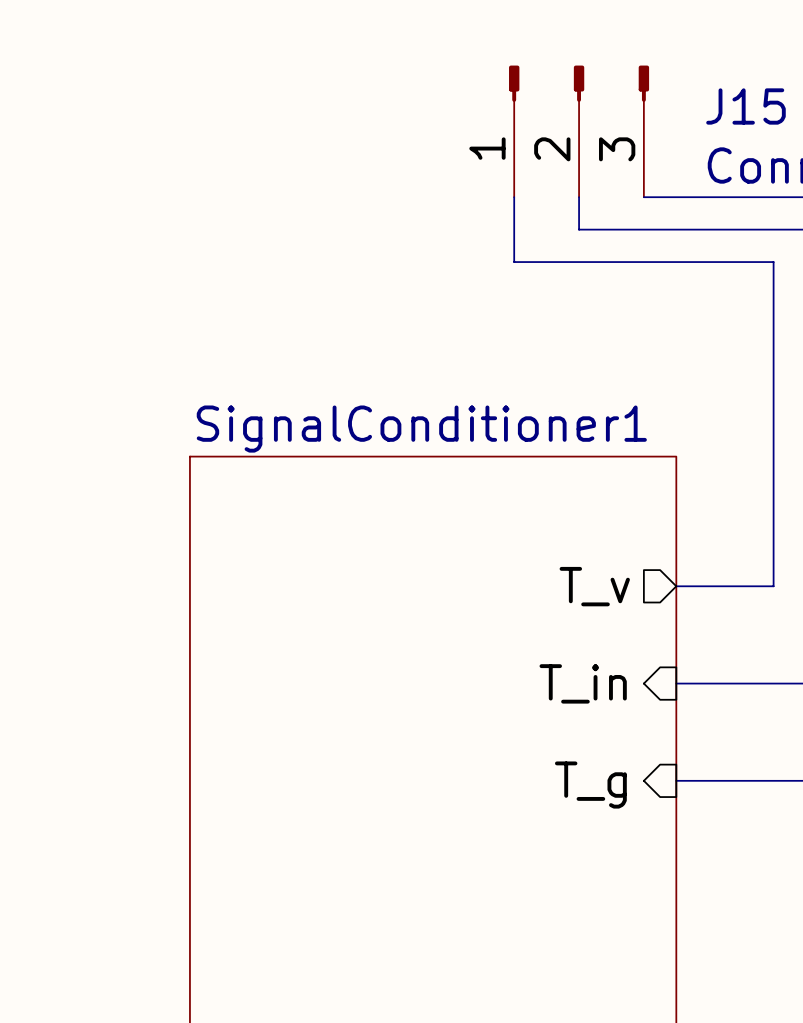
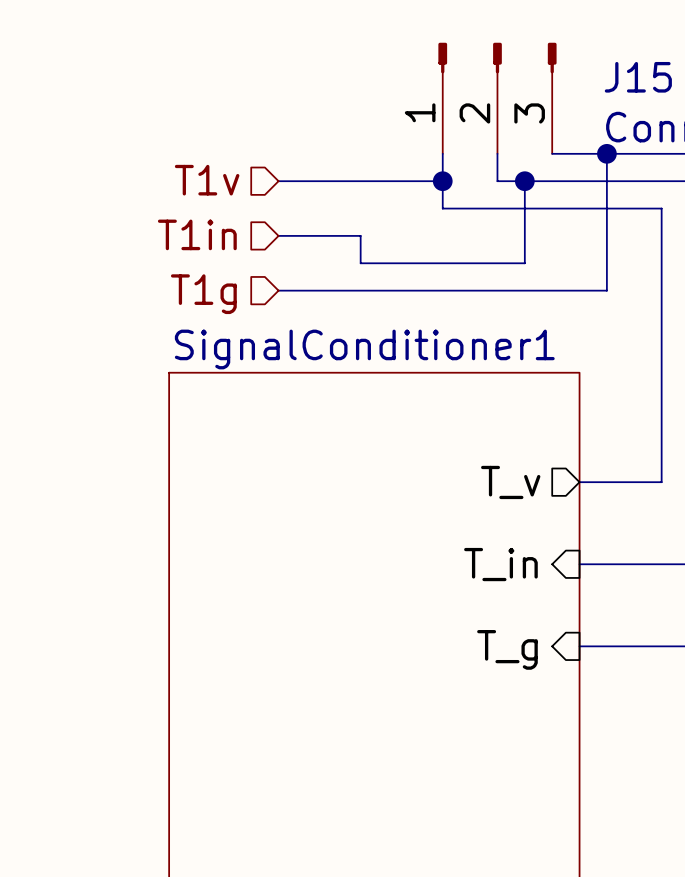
wire: none -> (606, 153) (606, 290) (278, 290)
junction: none -> (606, 153)
hierarchical label: none -> T1v (207, 180)
wire: none -> (278, 181) (442, 181)
junction: none -> (442, 181)
wire: none -> (524, 181) (524, 263) (360, 263) (360, 235) (278, 235)
junction: none -> (524, 181)
hierarchical label: none -> T1in (197, 234)
hierarchical label: none -> T1g (203, 294)

